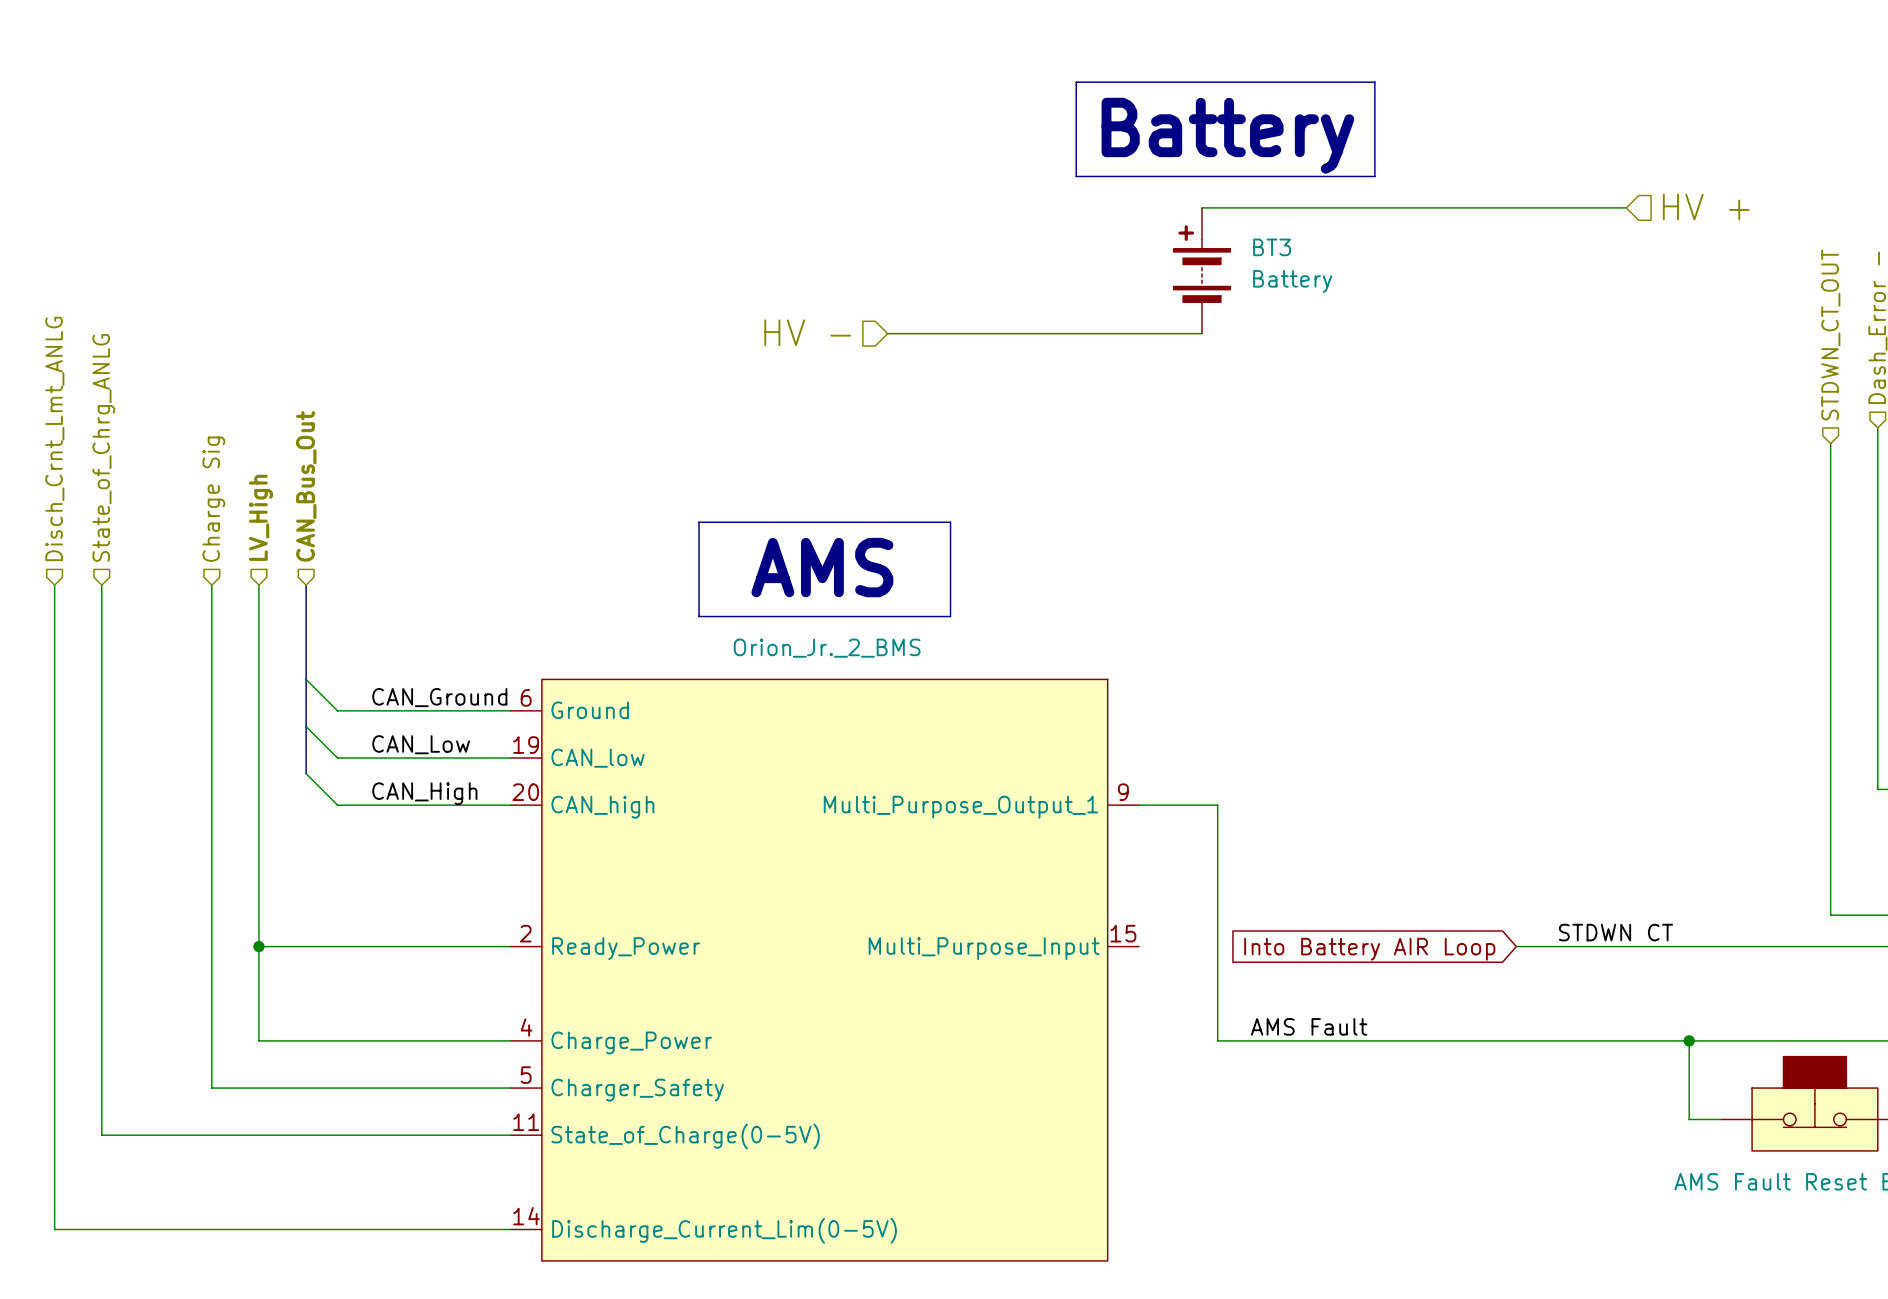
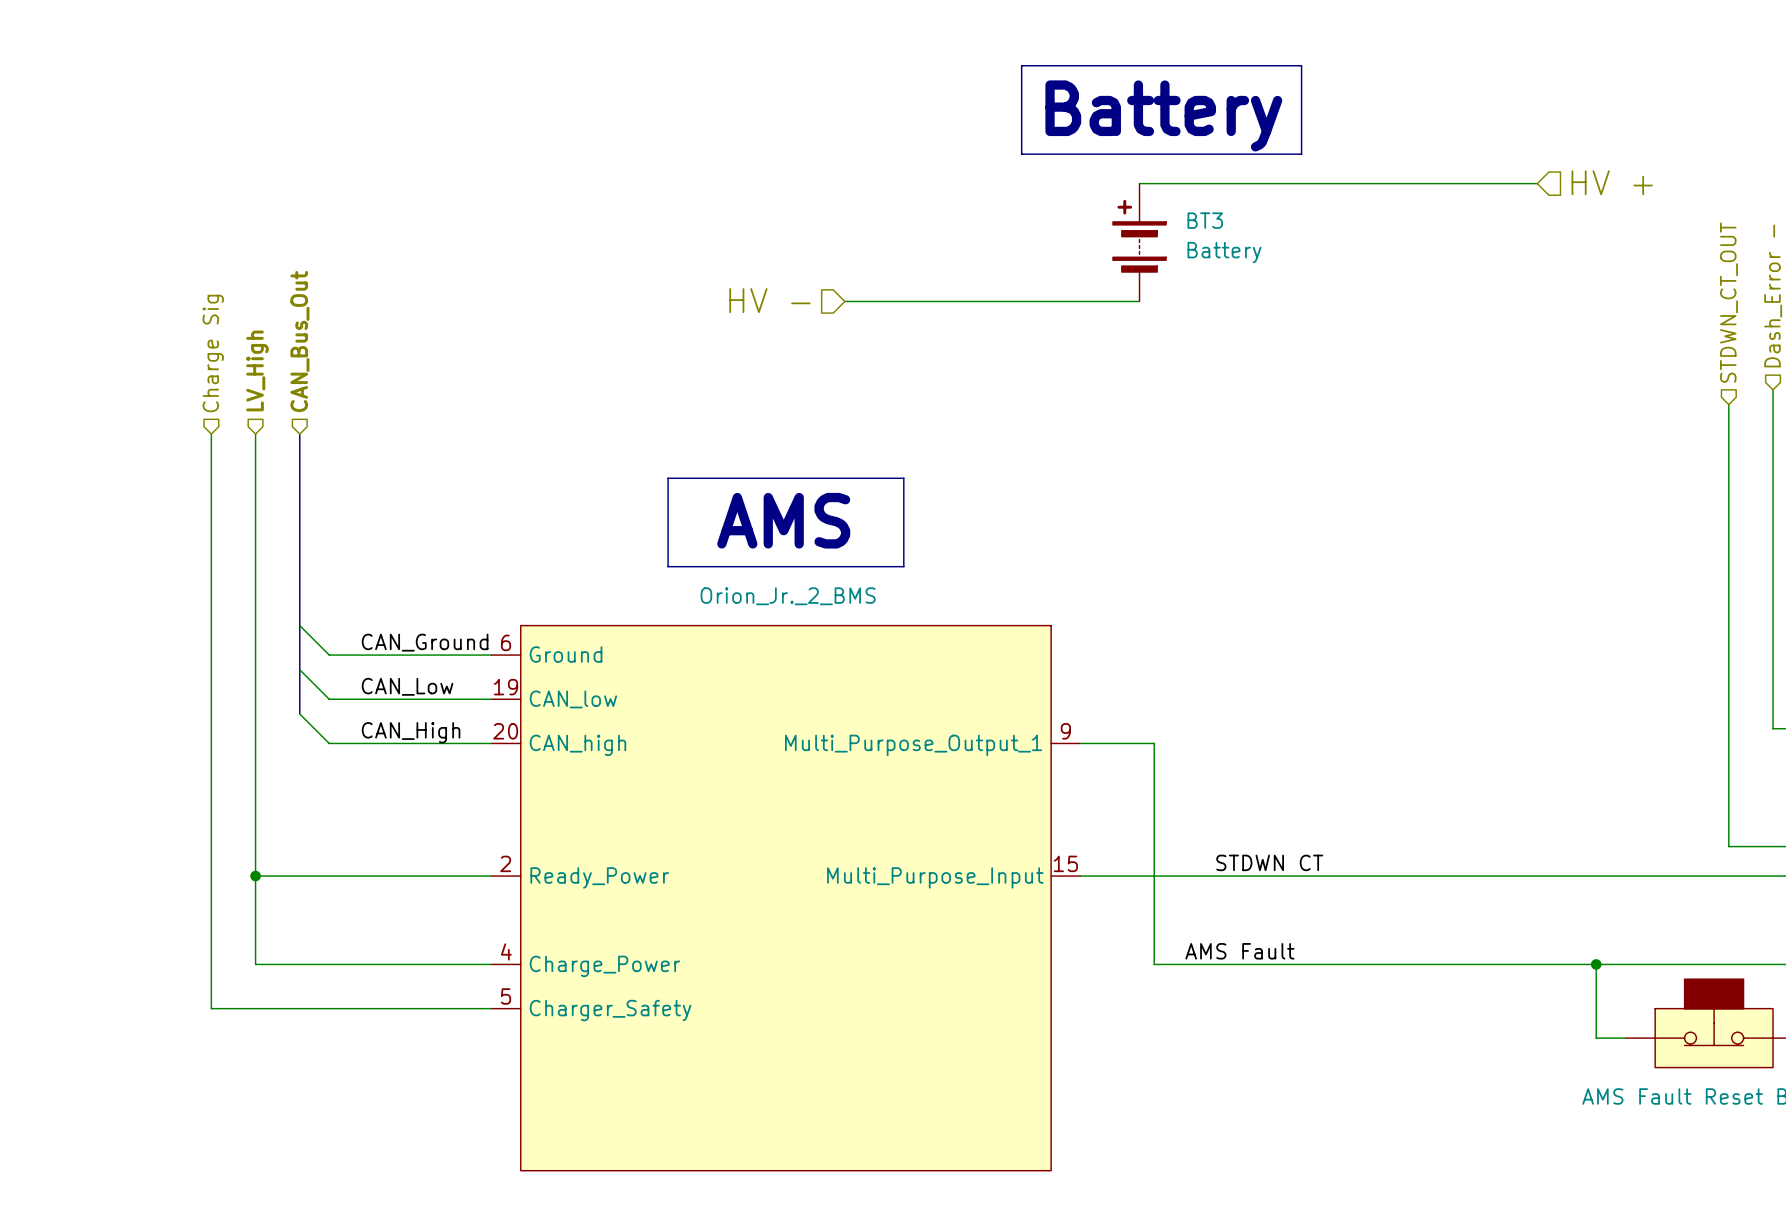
hierarchical label: Disch_Crnt_Lmt_ANLG (54, 438) -> none
hierarchical label: State_of_Chrg_ANLG (103, 447) -> none
wire: none -> (211, 434) (211, 537)
wire: none -> (255, 434) (255, 537)
bus: none -> (299, 434) (299, 537)
hierarchical label position: CAN_Bus_Out (306, 486) -> CAN_Bus_Out (299, 341)
hierarchical label position: Charge Sig (213, 499) -> Charge Sig (213, 353)
hierarchical label position: LV_High (260, 517) -> LV_High (257, 370)
wire: (54, 585) (54, 1229) (510, 1229) -> none
wire: (101, 585) (101, 1135) (510, 1135) -> none
part symbol: [510, 679, 1140, 1261] -> [491, 625, 1081, 1171]
label position: STDWN CT (1615, 932) -> STDWN CT (1269, 862)
wire: none -> (1080, 876) (1434, 876)
global label: Into Battery AIR Loop (1369, 949) -> none

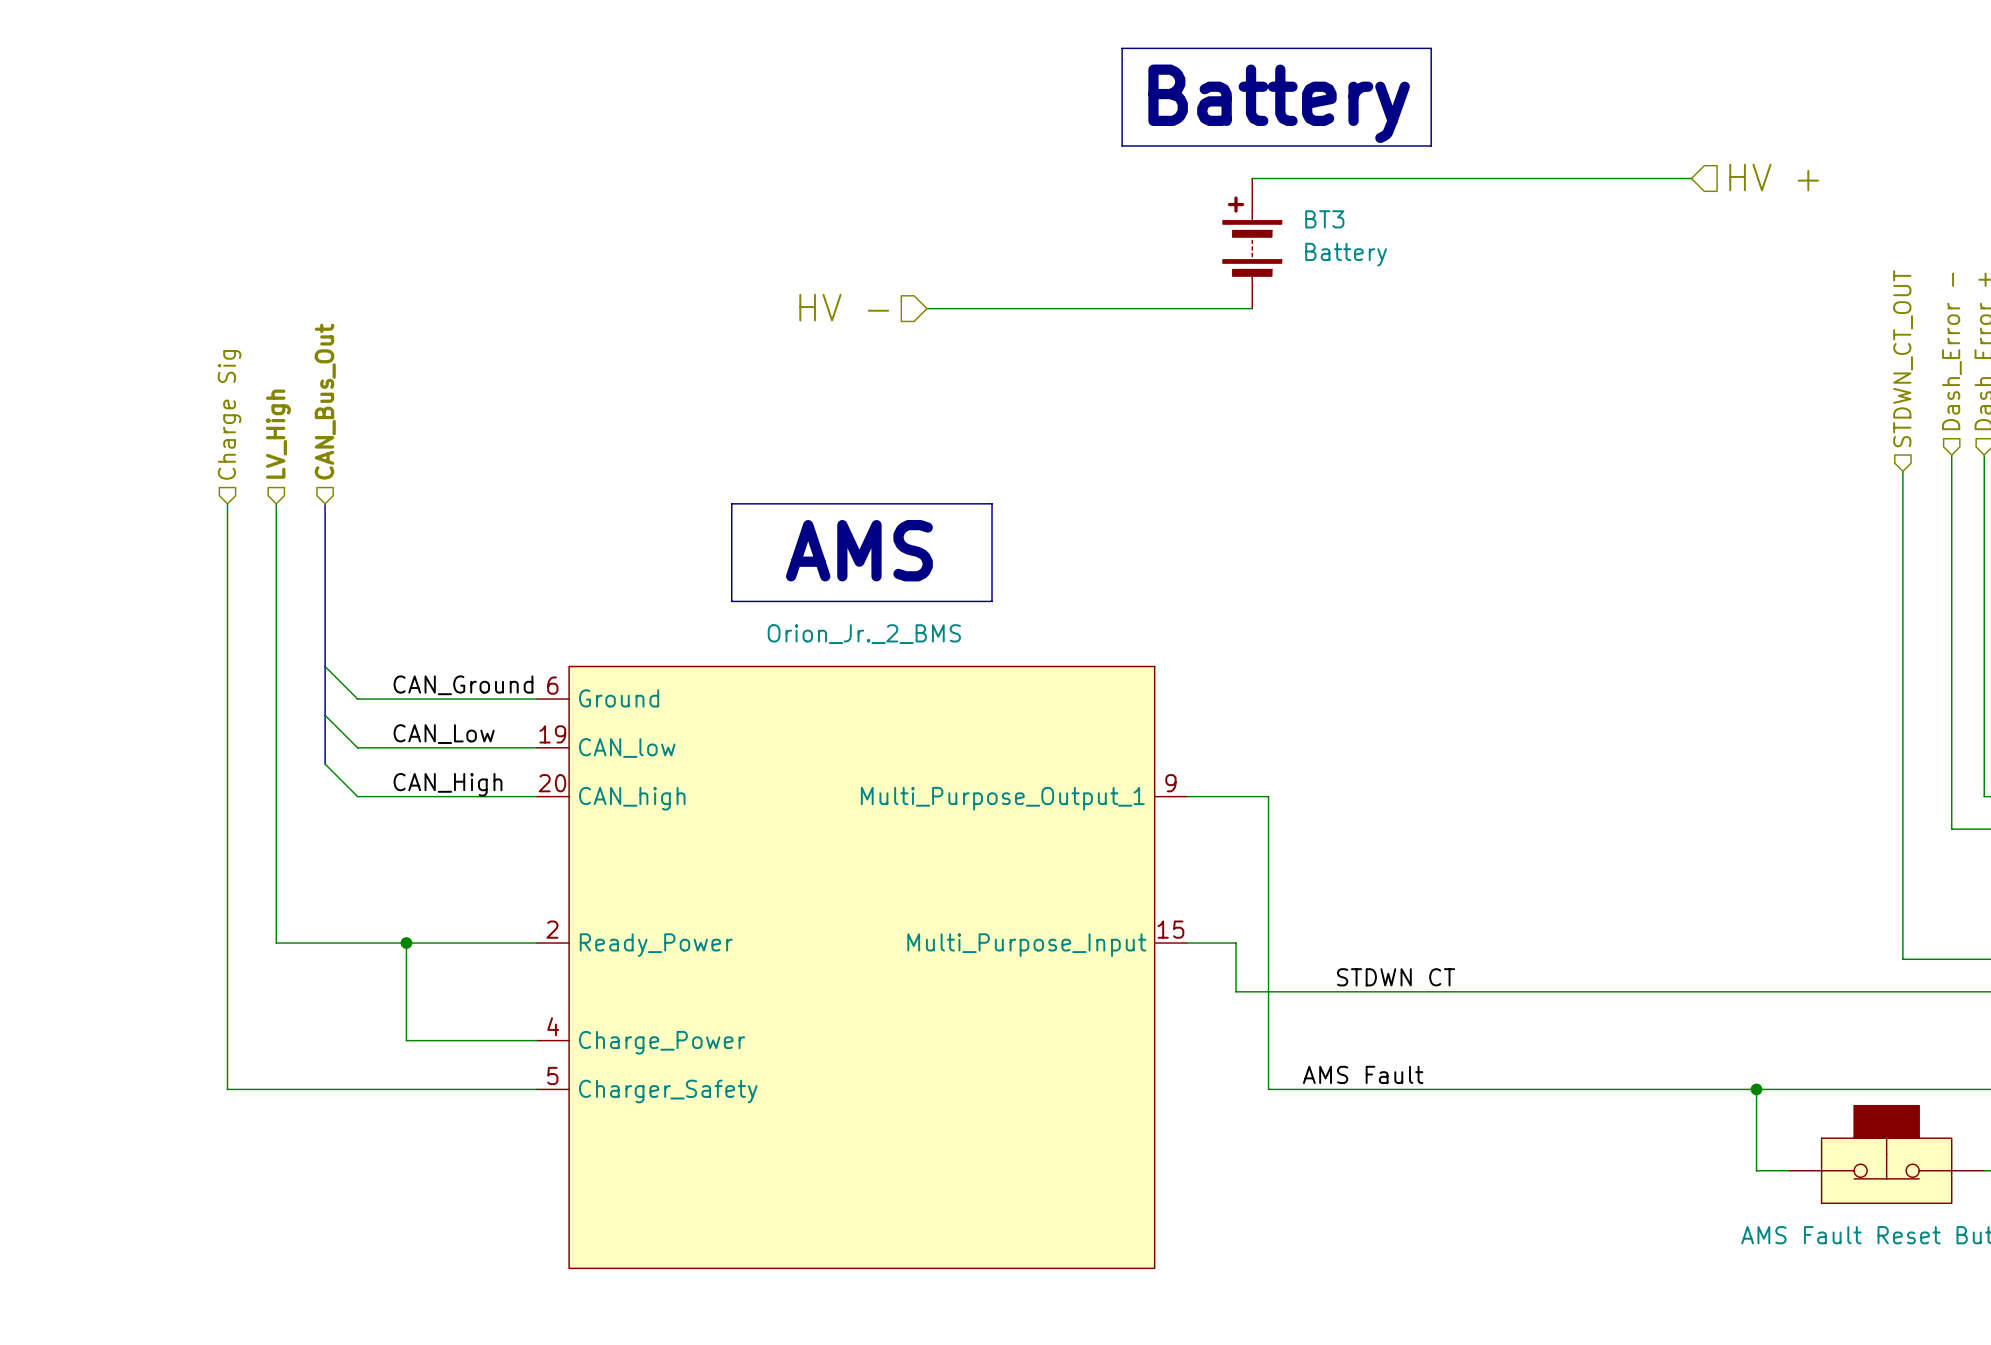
line: (1021, 65) (1301, 65) -> (1122, 97) (1122, 48) (1431, 48) (1431, 97)
line: (1021, 109) (1021, 154) (1301, 154) (1301, 109) -> (1122, 145) (1431, 145)
text position: Battery (1163, 115) -> Battery (1279, 103)
hierarchical label position: HV + (1612, 182) -> HV + (1774, 177)
wire: (1139, 183) (1537, 183) -> (1252, 178) (1691, 178)
BT3 position: (1139, 242) -> (1252, 243)
hierarchical label position: HV - (769, 300) -> HV - (844, 307)
wire: (844, 301) (1139, 301) -> (926, 308) (1252, 308)
line: (668, 478) (903, 478) -> (731, 552) (731, 503) (992, 503) (992, 552)
text position: AMS (783, 520) -> AMS (859, 550)
line: (668, 522) (668, 566) (903, 566) (903, 522) -> (731, 601) (992, 601)
label: none -> CAN_Ground (463, 685)
label: CAN_Ground (425, 642) -> CAN_Low (444, 734)
bus: (299, 669) (299, 713) -> none
label: CAN_Low (407, 686) -> CAN_High (447, 784)
wire: (299, 713) (329, 743) (491, 743) -> (325, 666) (357, 699) (536, 699)
label: CAN_High (411, 732) -> none
wire: (1080, 743) (1154, 743) -> (1187, 796) (1268, 796) (1268, 845)
wire: (255, 831) (255, 964) -> (227, 1089) (276, 1089)
wire: none -> (406, 943) (406, 1040) (536, 1040)
junction: none -> (406, 943)
wire: (255, 876) (491, 876) -> (276, 943) (536, 943)
junction: (255, 876) -> none
wire: (1080, 876) (1124, 876) -> (1187, 943) (1236, 943) (1236, 991)
part position: (785, 898) -> (861, 967)
wire: (211, 964) (211, 1008) (491, 1008) -> none

